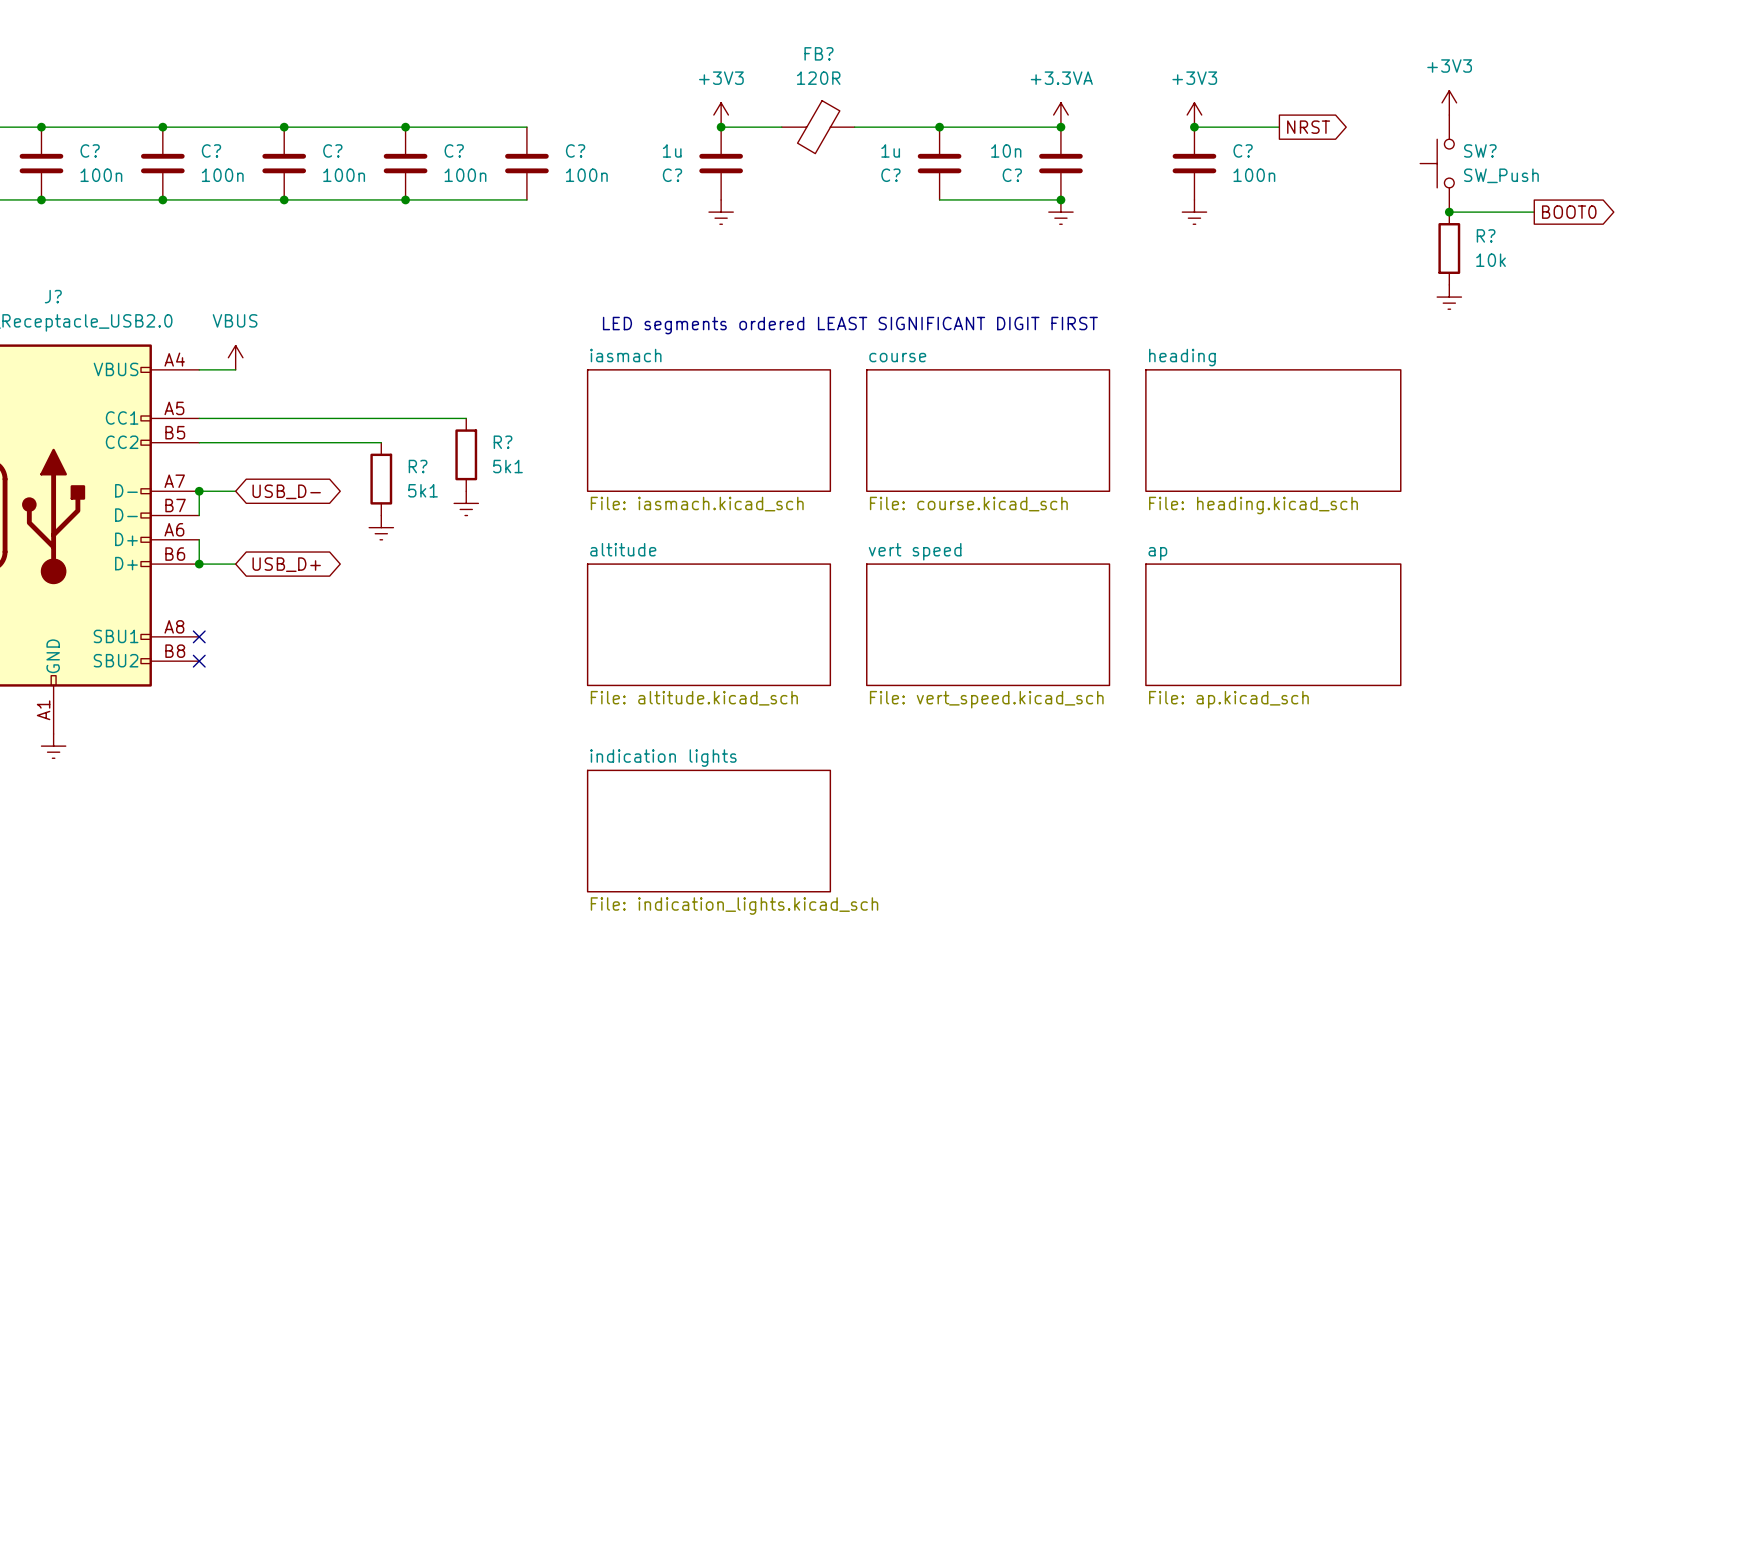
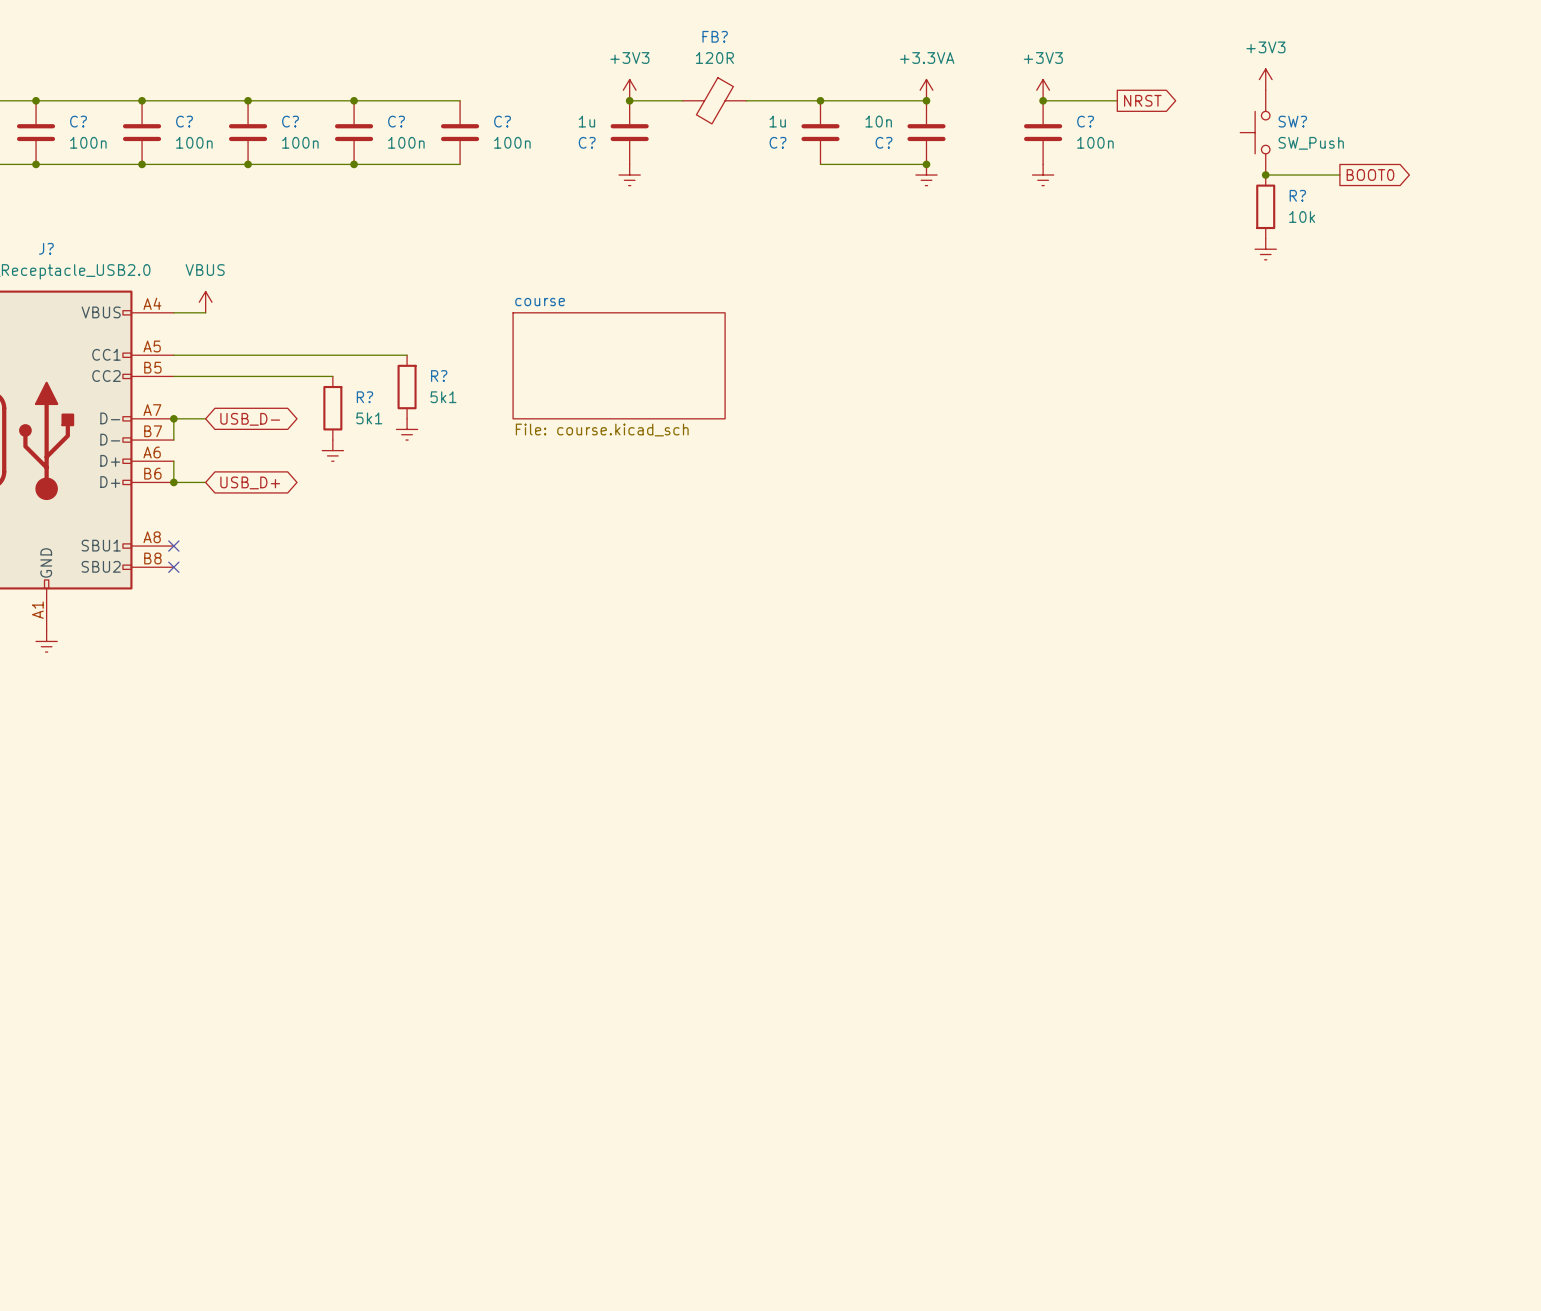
text: LED segments ordered LEAST SIGNIFICANT DIGIT FIRST (850, 325) -> none
sheet iasmach name: iasmach (625, 355) -> course (540, 302)
sheet course: File: course.kicad_sch (988, 430) -> none
sheet heading: File: heading.kicad_sch (1273, 430) -> none
sheet iasmach value: File: iasmach.kicad_sch (697, 504) -> File: course.kicad_sch (602, 430)
sheet altitude: File: altitude.kicad_sch (708, 624) -> none
sheet vert speed: File: vert_speed.kicad_sch (988, 624) -> none
sheet ap: File: ap.kicad_sch (1273, 624) -> none
sheet indication lights: File: indication_lights.kicad_sch (708, 831) -> none

